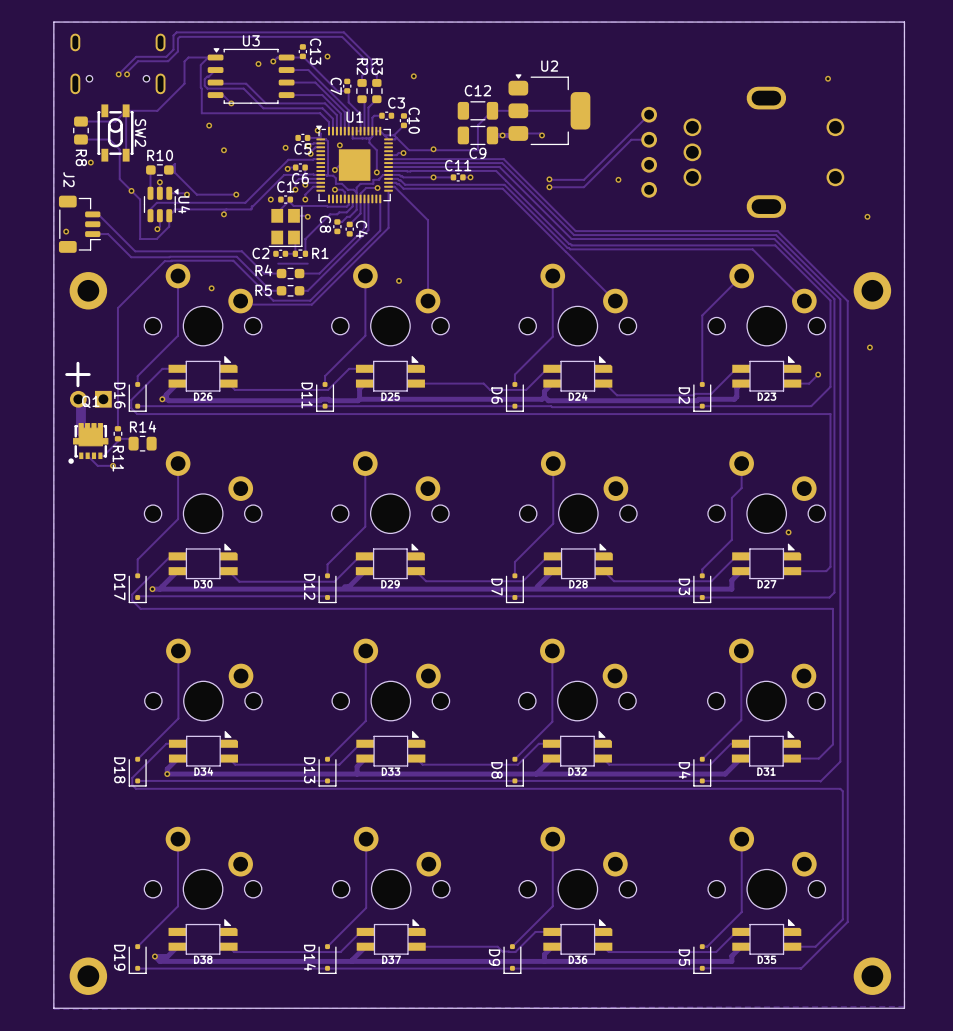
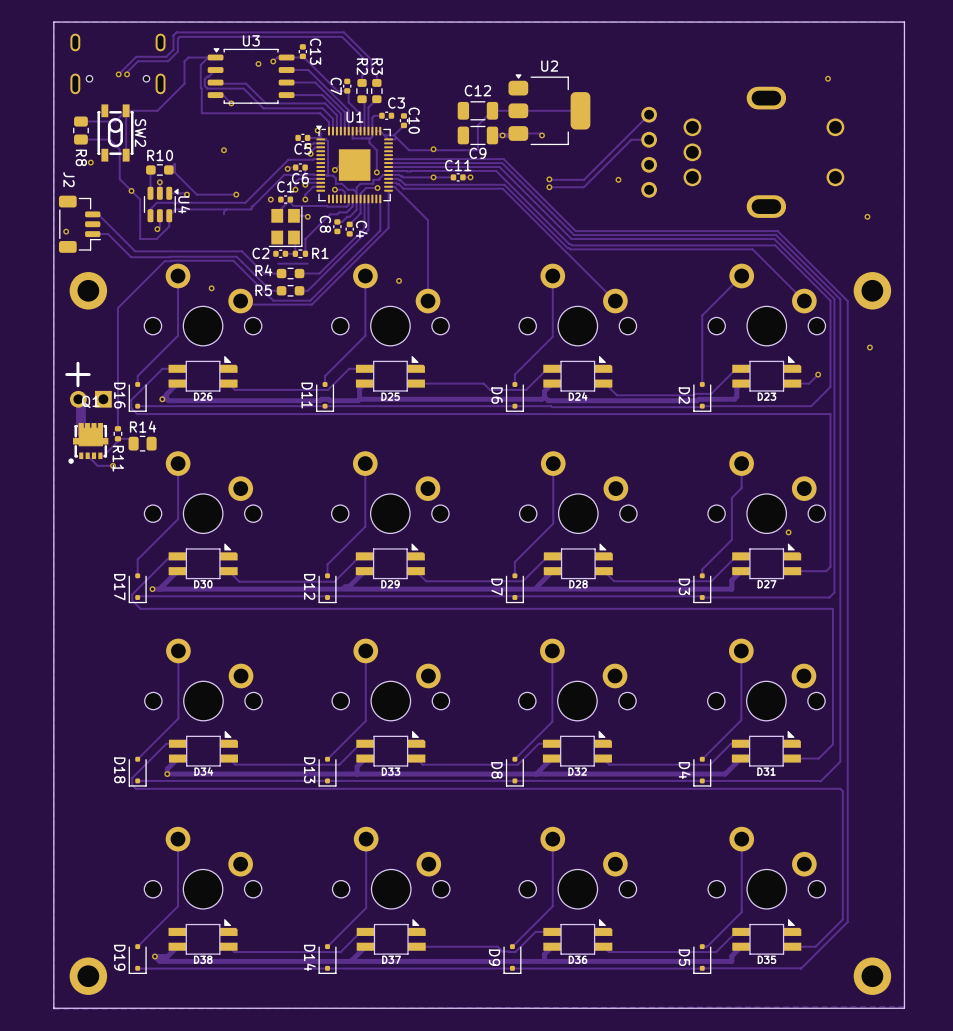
via: (327, 56) -> none
via: (413, 76) -> none
via: (209, 125) -> none
via: (339, 145) -> none
via: (285, 147) -> none
track: (403, 153) (388, 155) -> none
via: (403, 153) -> none
via: (223, 214) -> none

